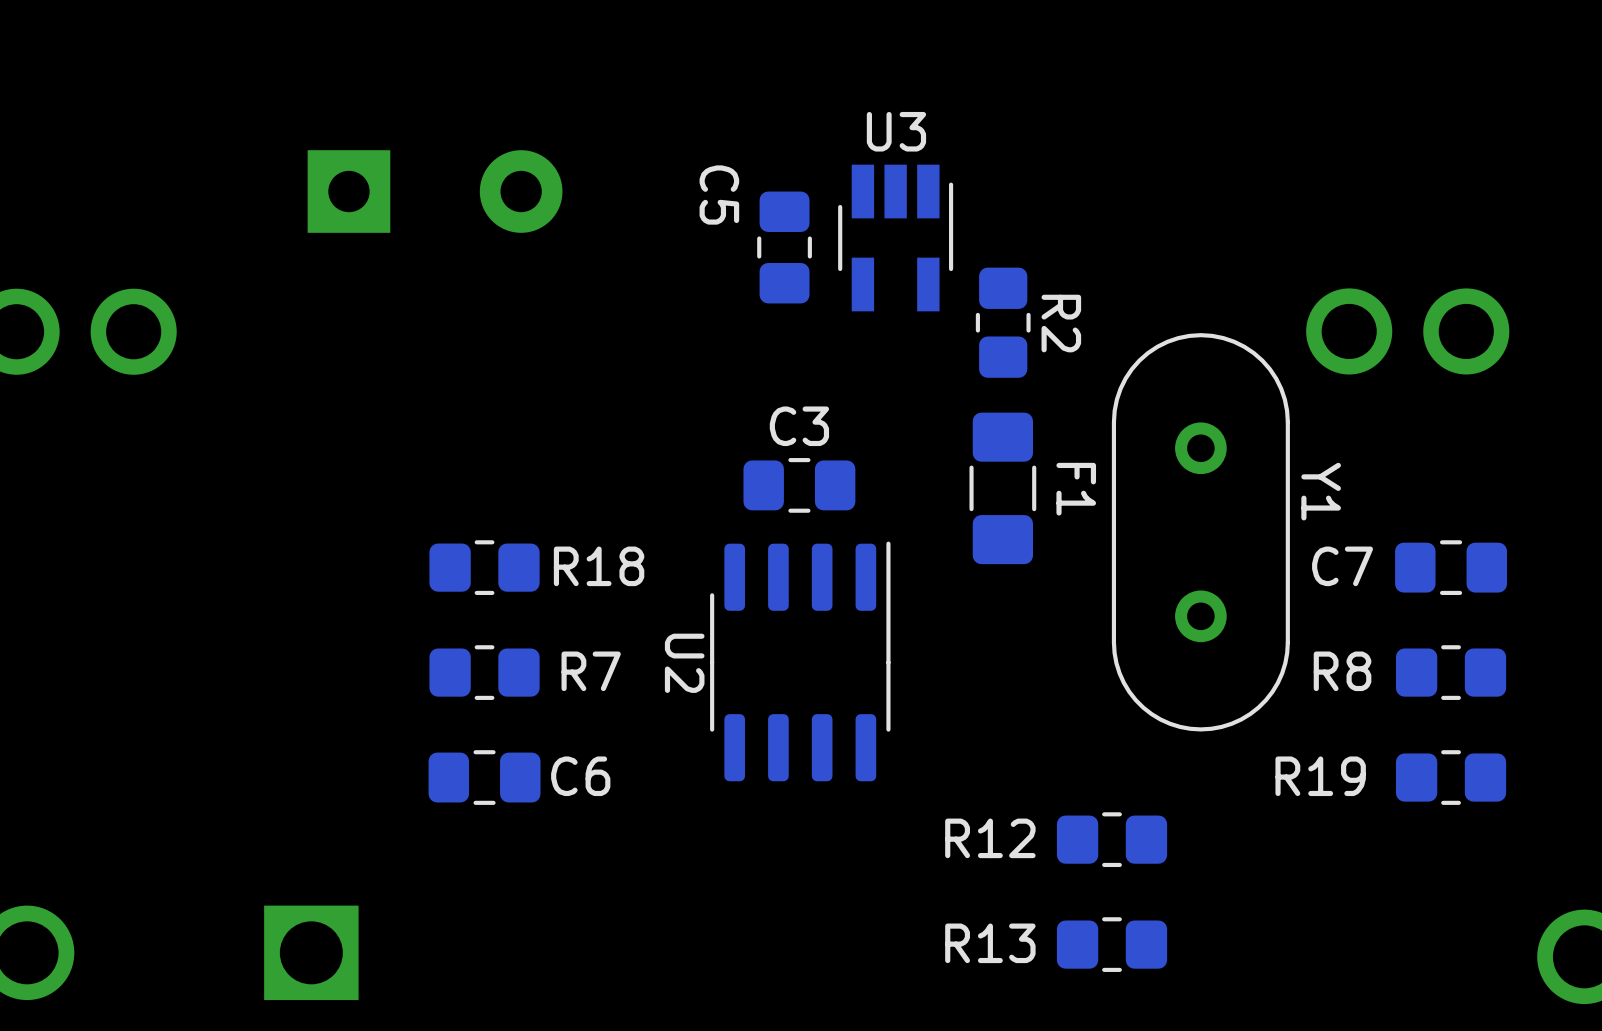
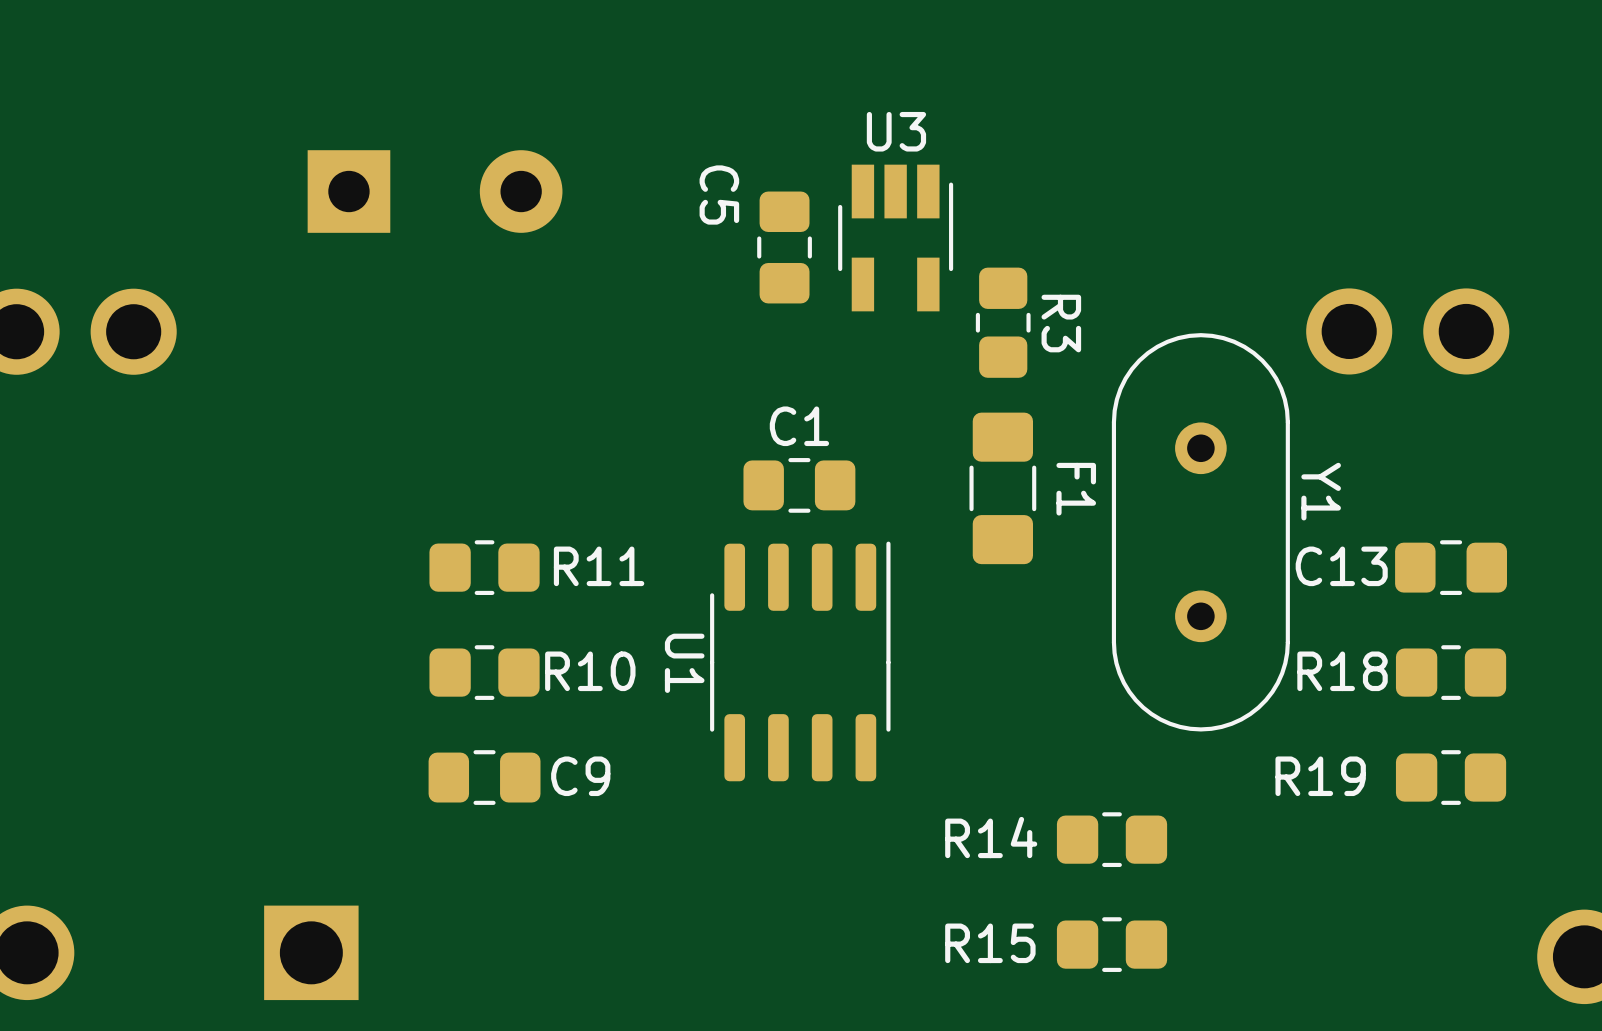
R2 name: R2 (1061, 323) -> R3 (1061, 323)
C3 name: C3 (799, 426) -> C1 (799, 426)
R18 name: R18 (599, 566) -> R11 (599, 566)
C7 name: C7 (1342, 566) -> C13 (1341, 566)
U2 name: U2 (684, 663) -> U1 (684, 663)
R7 name: R7 (591, 671) -> R10 (590, 671)
R8 name: R8 (1342, 671) -> R18 (1342, 671)
C6 name: C6 (580, 776) -> C9 (580, 776)
R12 name: R12 (990, 838) -> R14 (991, 837)
R13 name: R13 (990, 943) -> R15 (990, 943)

